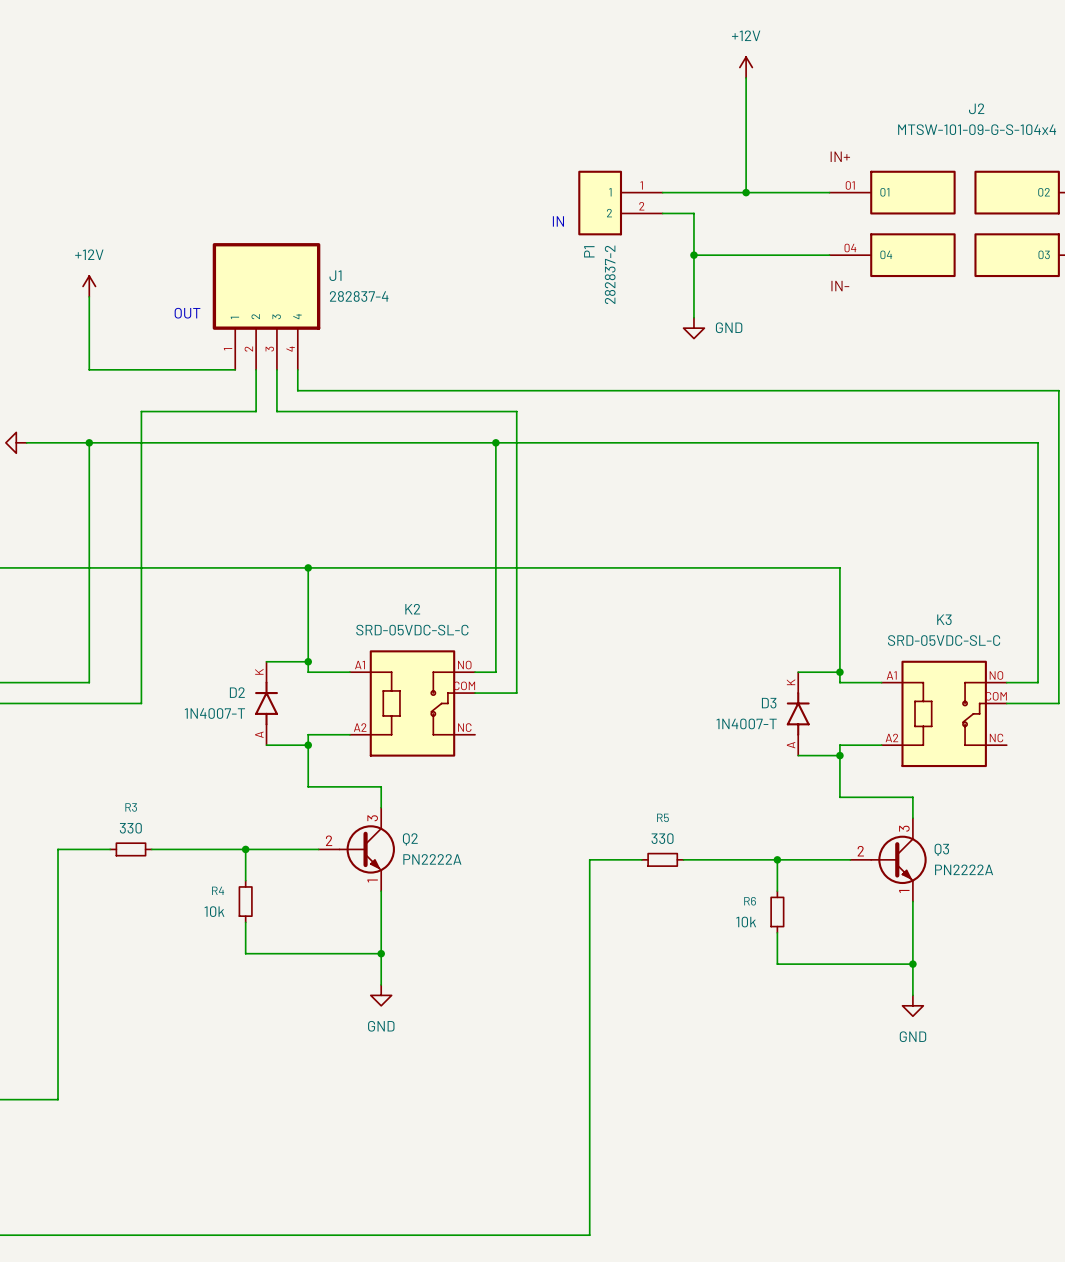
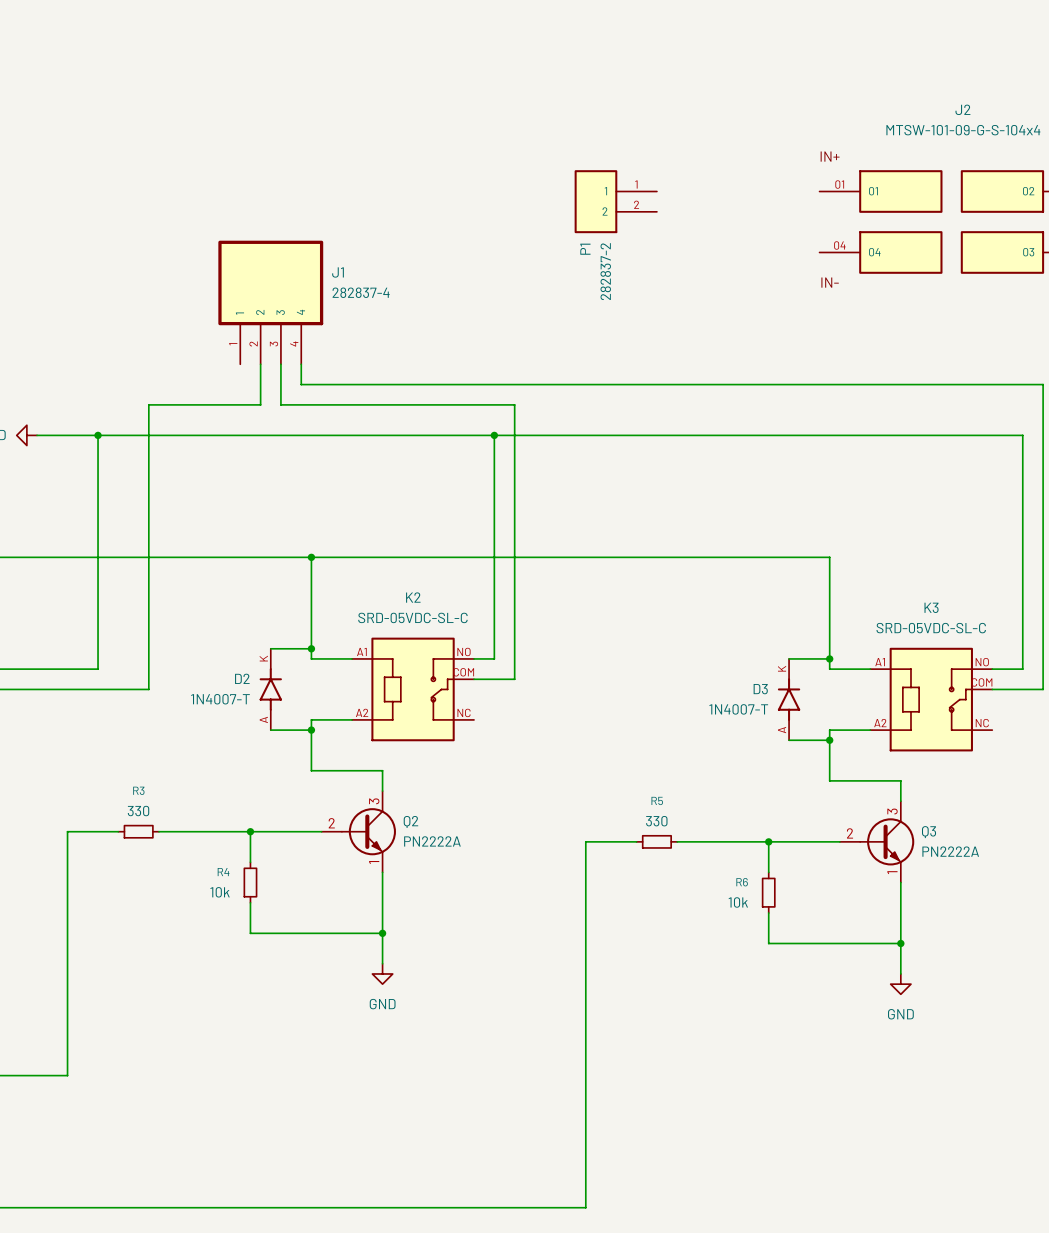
power symbol: +12V (746, 67) -> none
wire: (746, 77) (746, 192) -> none
wire: (662, 192) (829, 192) -> none
junction: (746, 192) -> none
wire: (662, 213) (693, 213) (693, 317) -> none
text: IN (558, 221) -> none
wire: (693, 255) (829, 255) -> none
junction: (693, 255) -> none
power symbol: +12V (89, 286) -> none
wire: (89, 296) (89, 369) (235, 369) -> none
text: OUT (187, 313) -> none
power symbol: GND (693, 328) -> none

